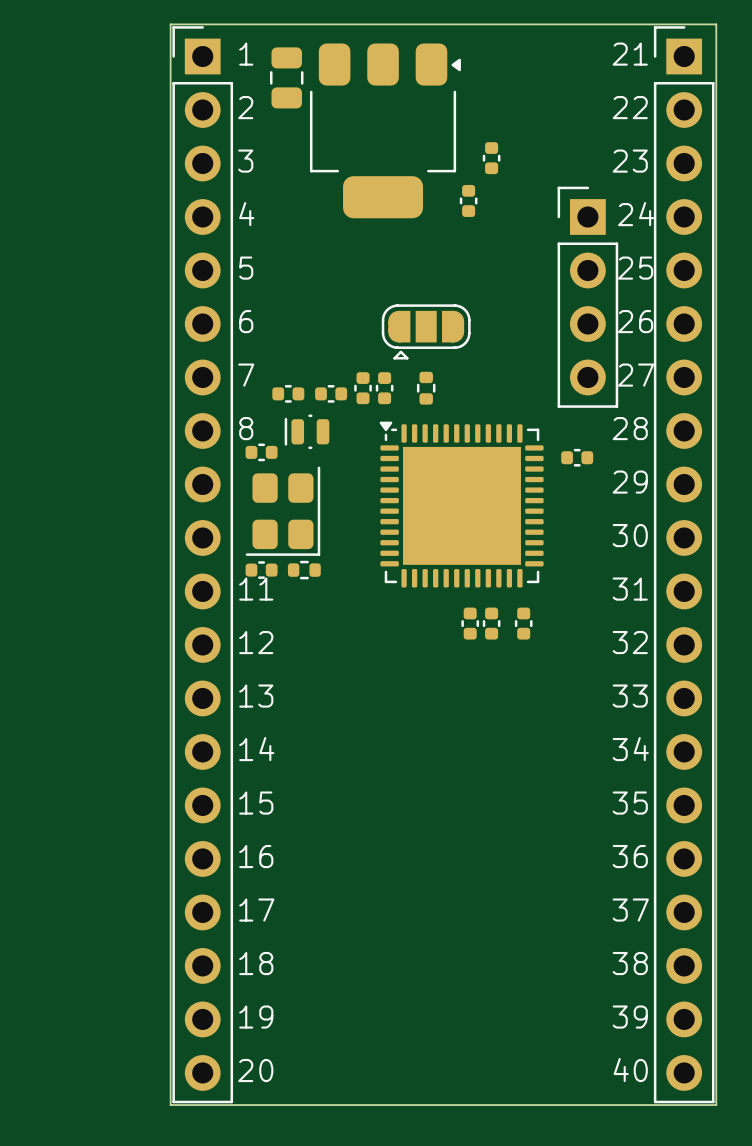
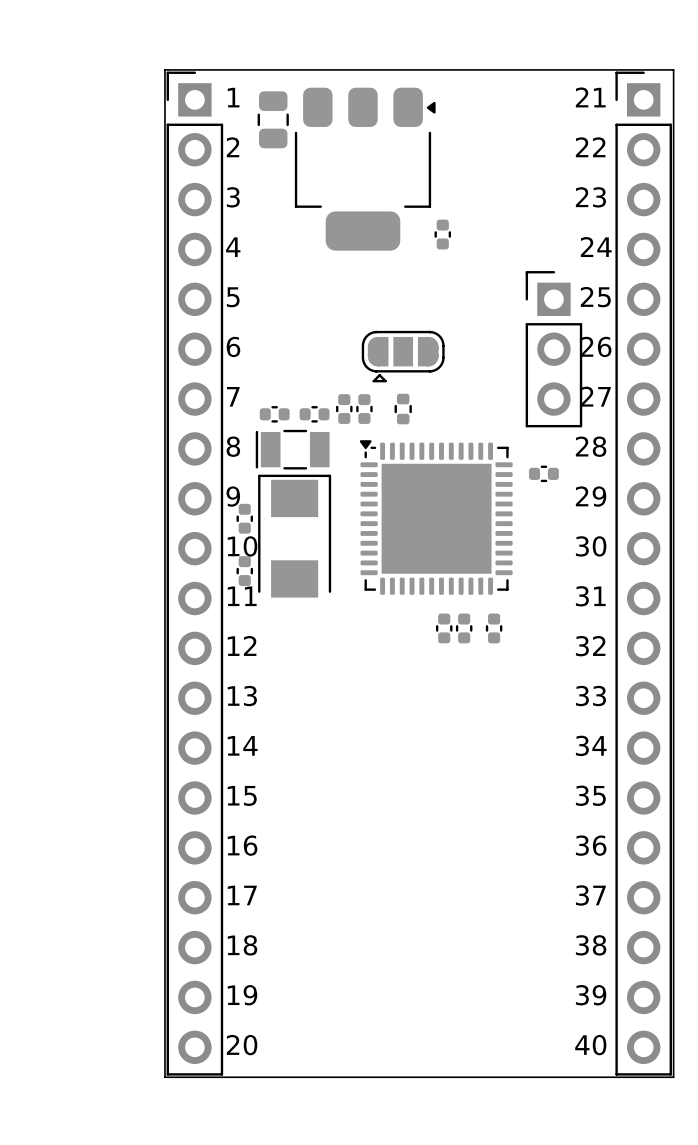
part: (491, 158) -> none
part: (587, 297) -> none
part: none -> (553, 349)
part footprint: [284, 414, 330, 450] -> [255, 429, 330, 470]
part rotation: 0° (261, 452) -> 90° clockwise (244, 518)
part position: (261, 452) -> (244, 518)
text: none -> 9 (233, 496)
part: (282, 511) -> none
part: none -> (294, 536)
text: none -> 10 (242, 546)
part rotation: 0° (261, 570) -> 90° clockwise (244, 571)
part: (304, 570) -> none

